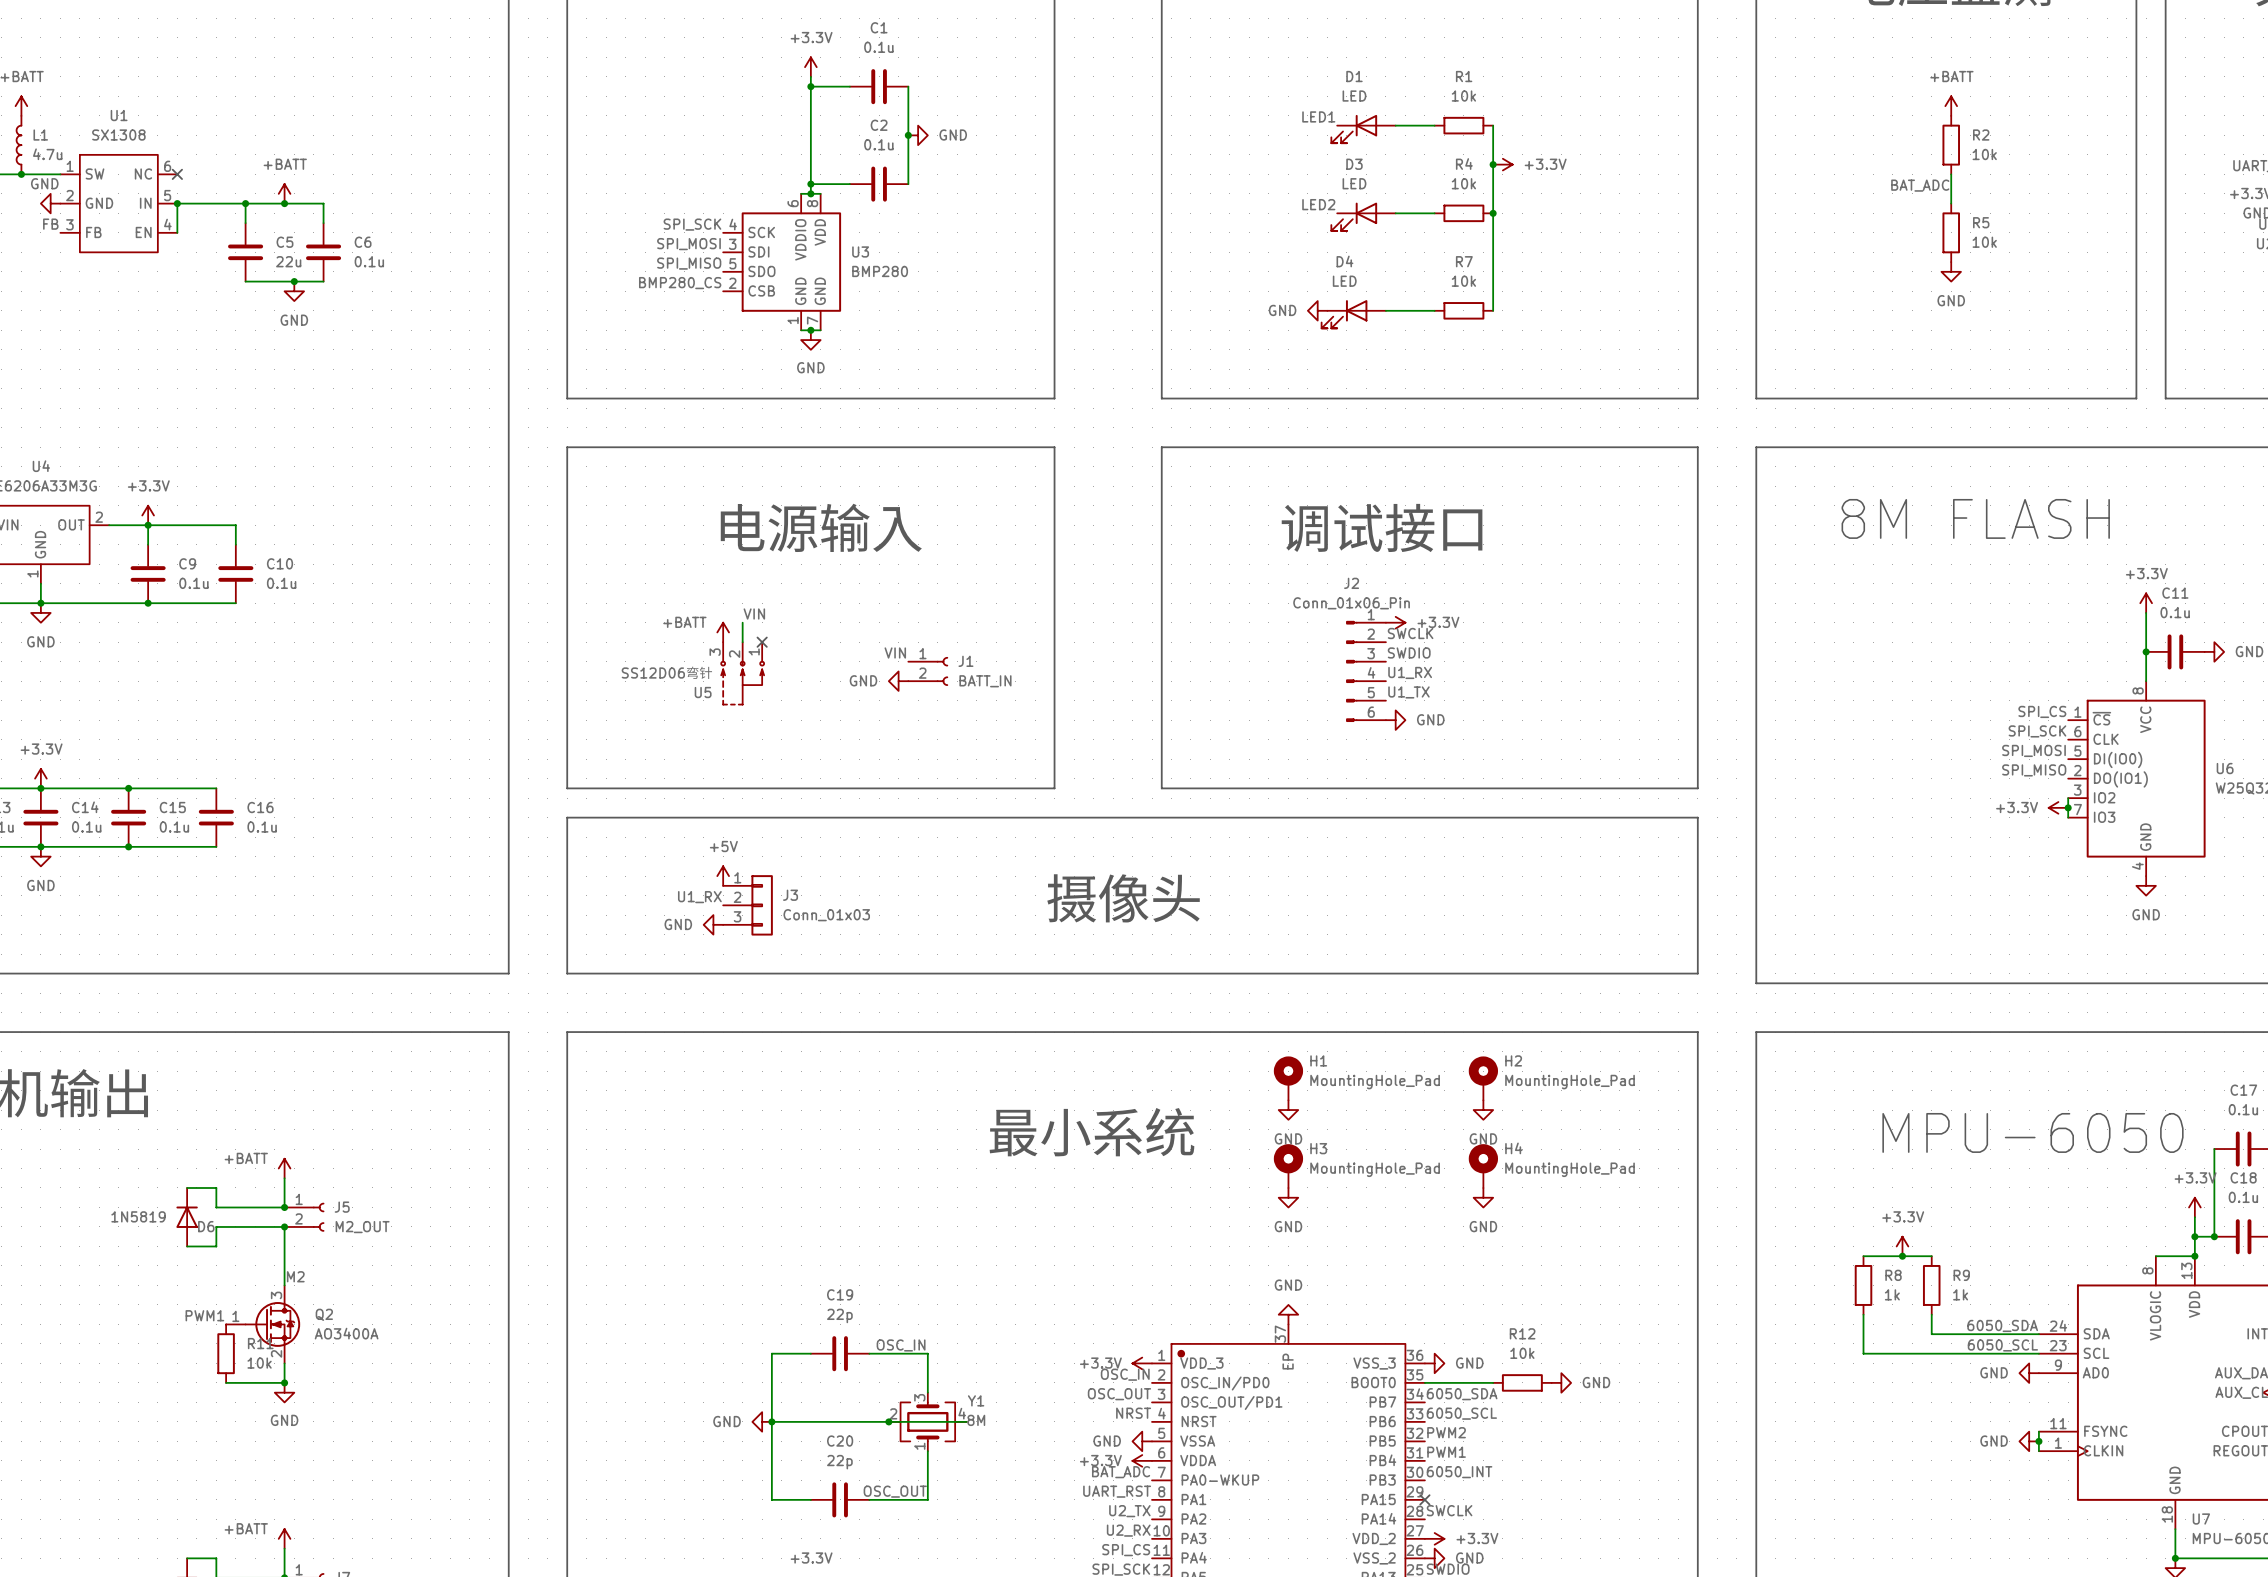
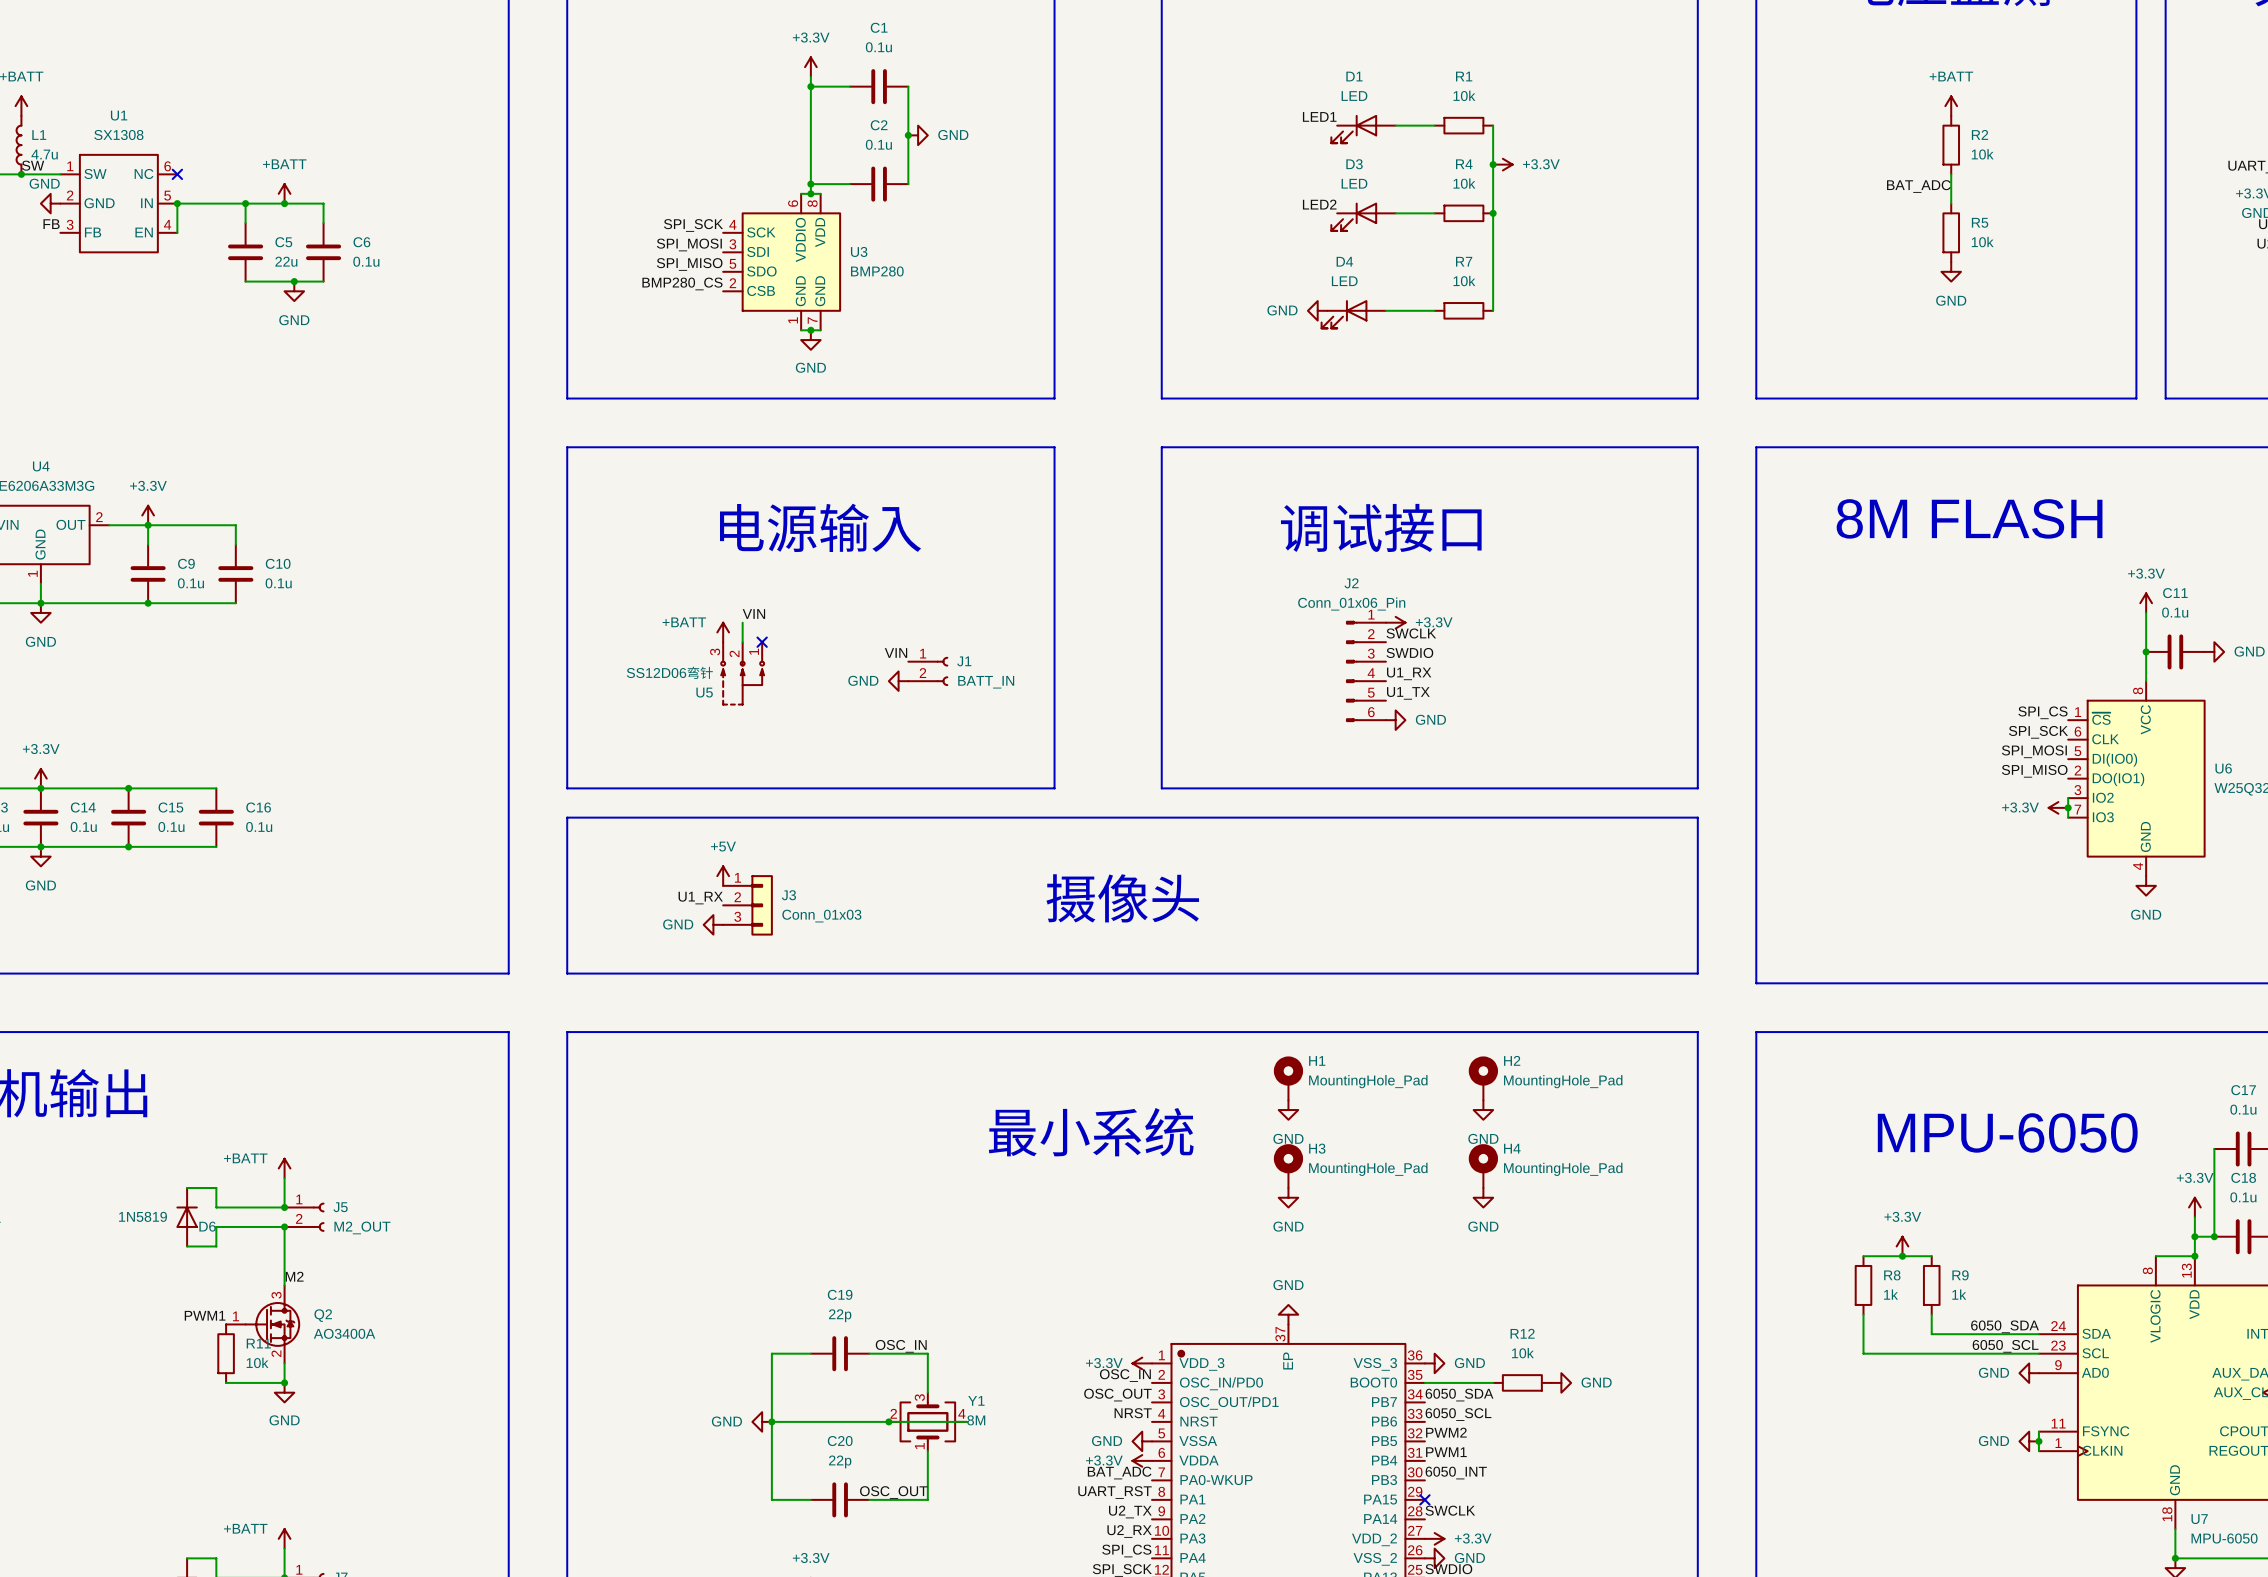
label: none -> SW (33, 165)

